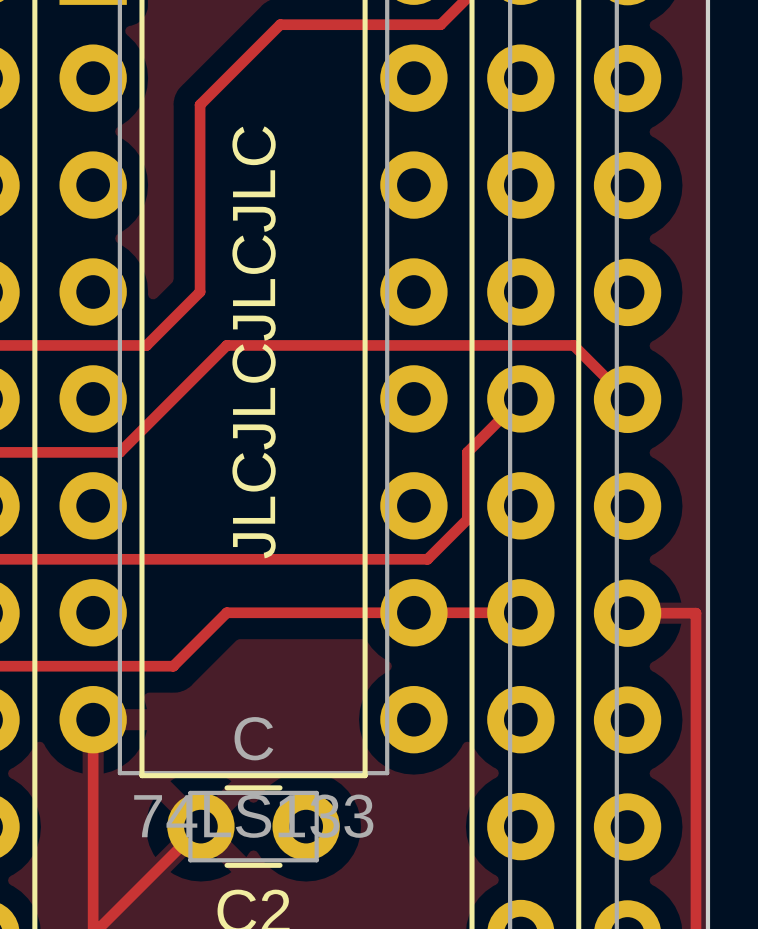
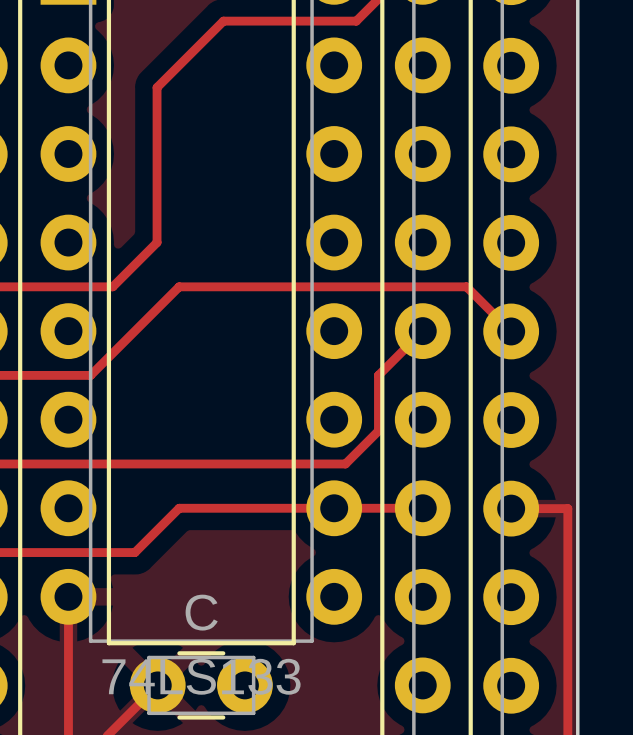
text: JLCJLCJLCJLC (254, 342) -> none

